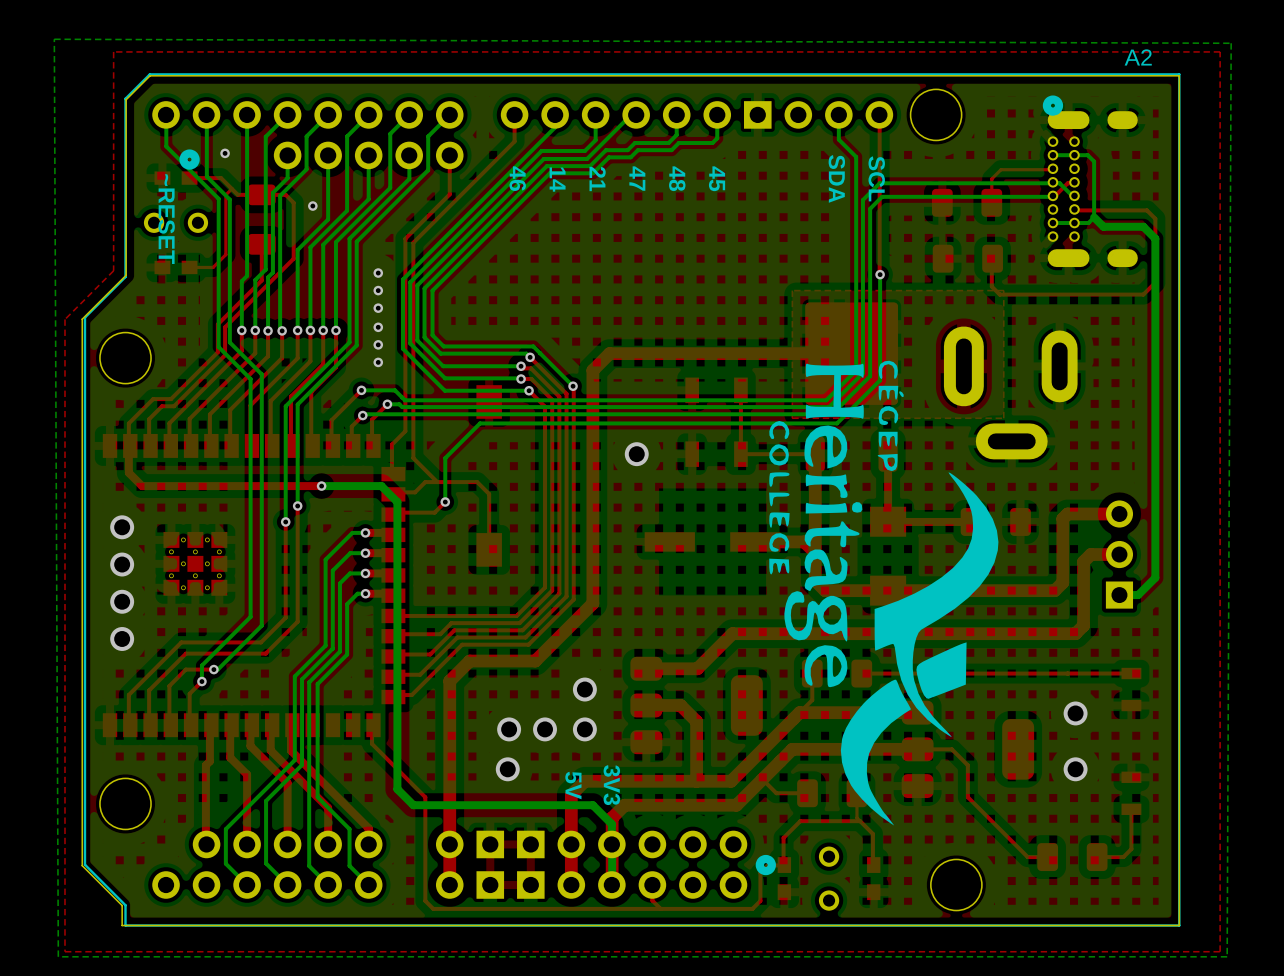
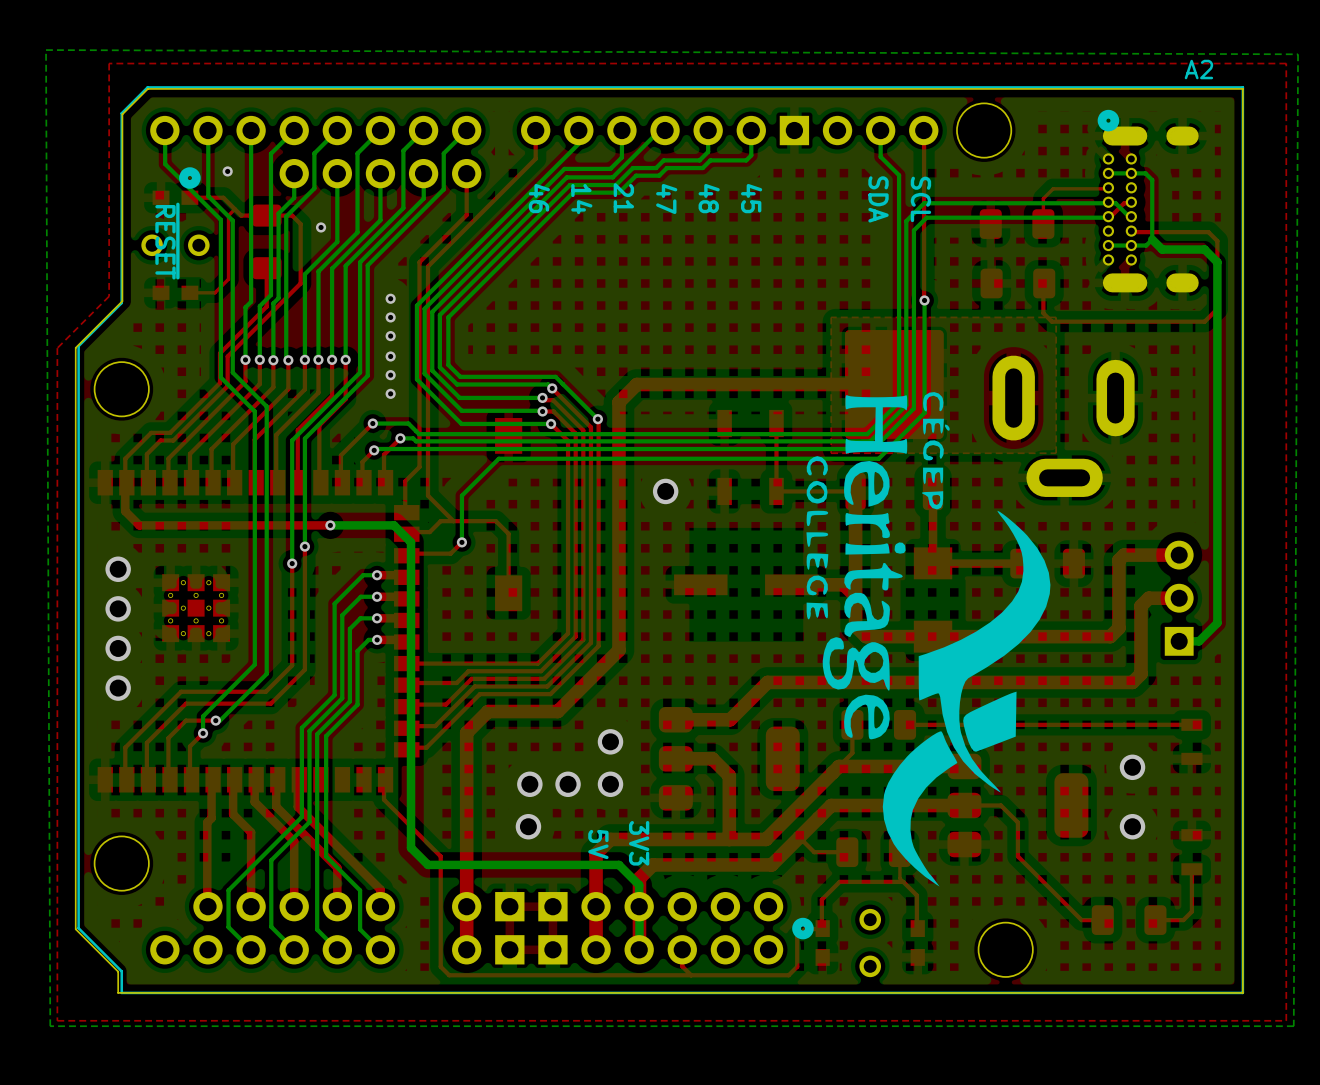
~RESET name: ~RESET (166, 219) -> ~{RESET} (167, 241)

